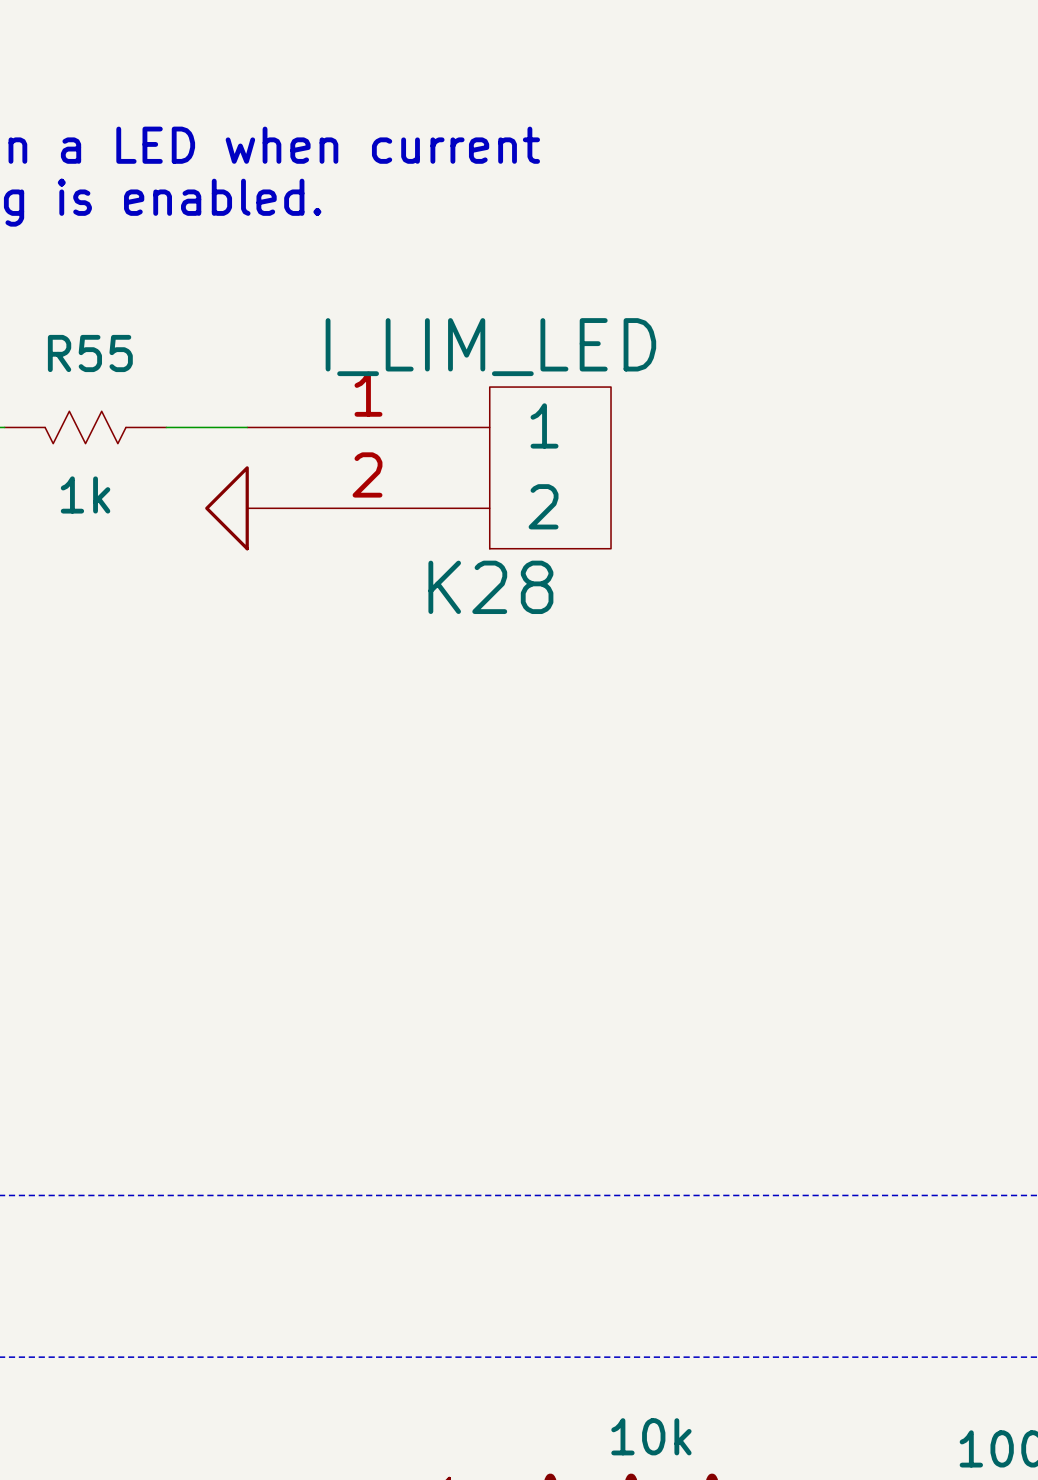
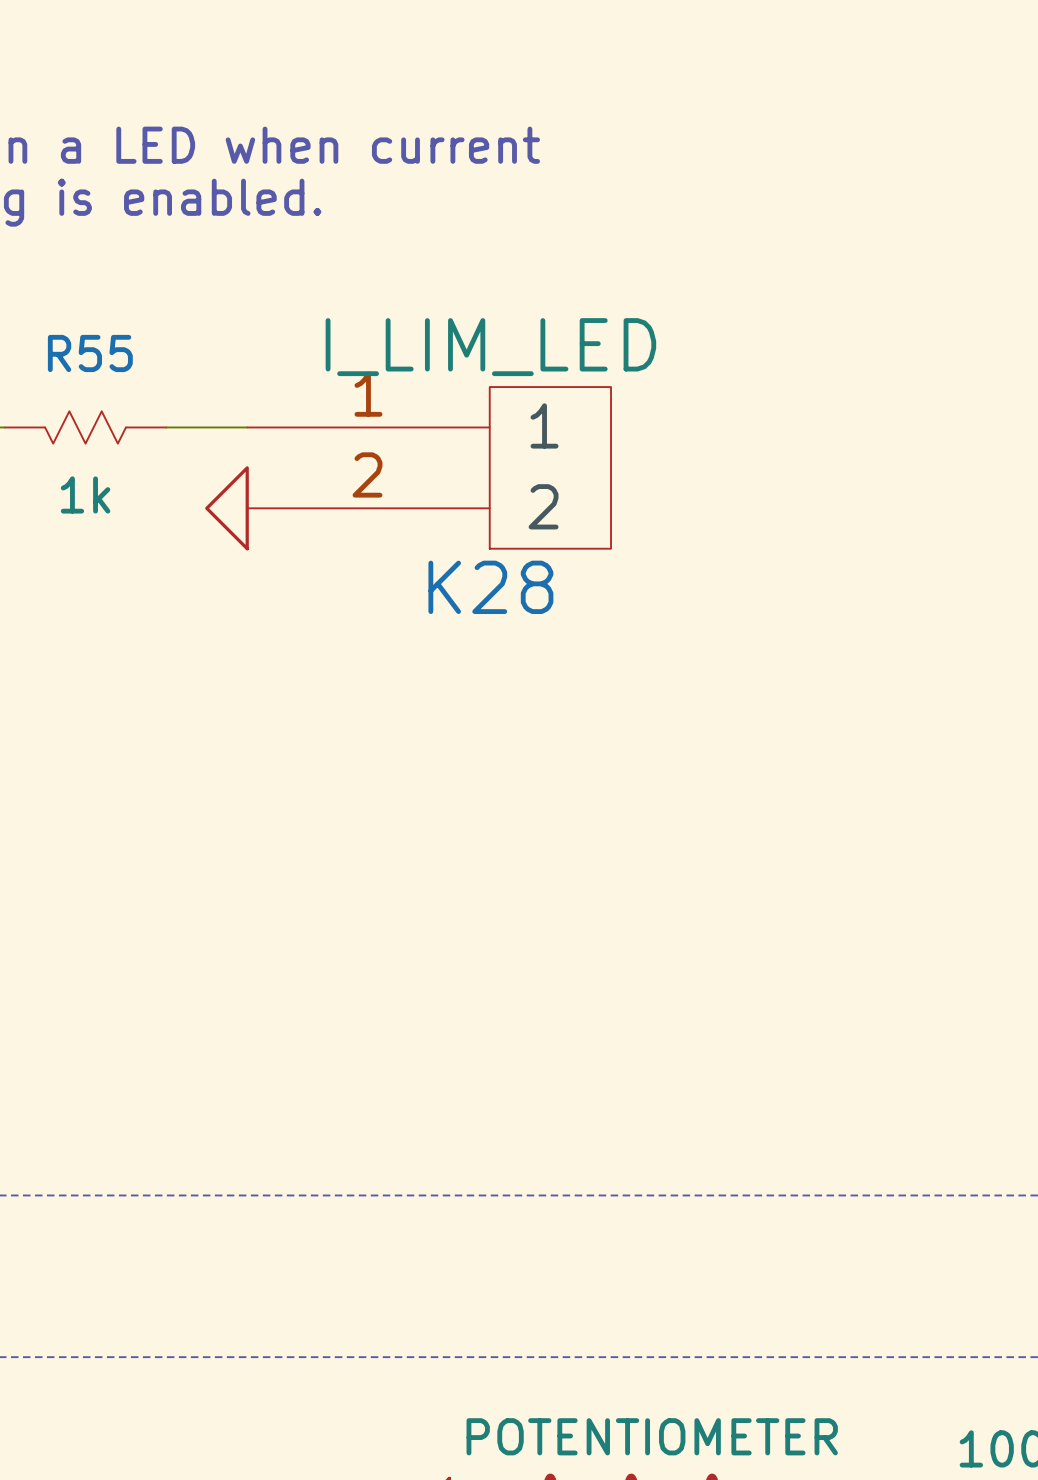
part value: 10k (651, 1436) -> POTENTIOMETER (652, 1436)

